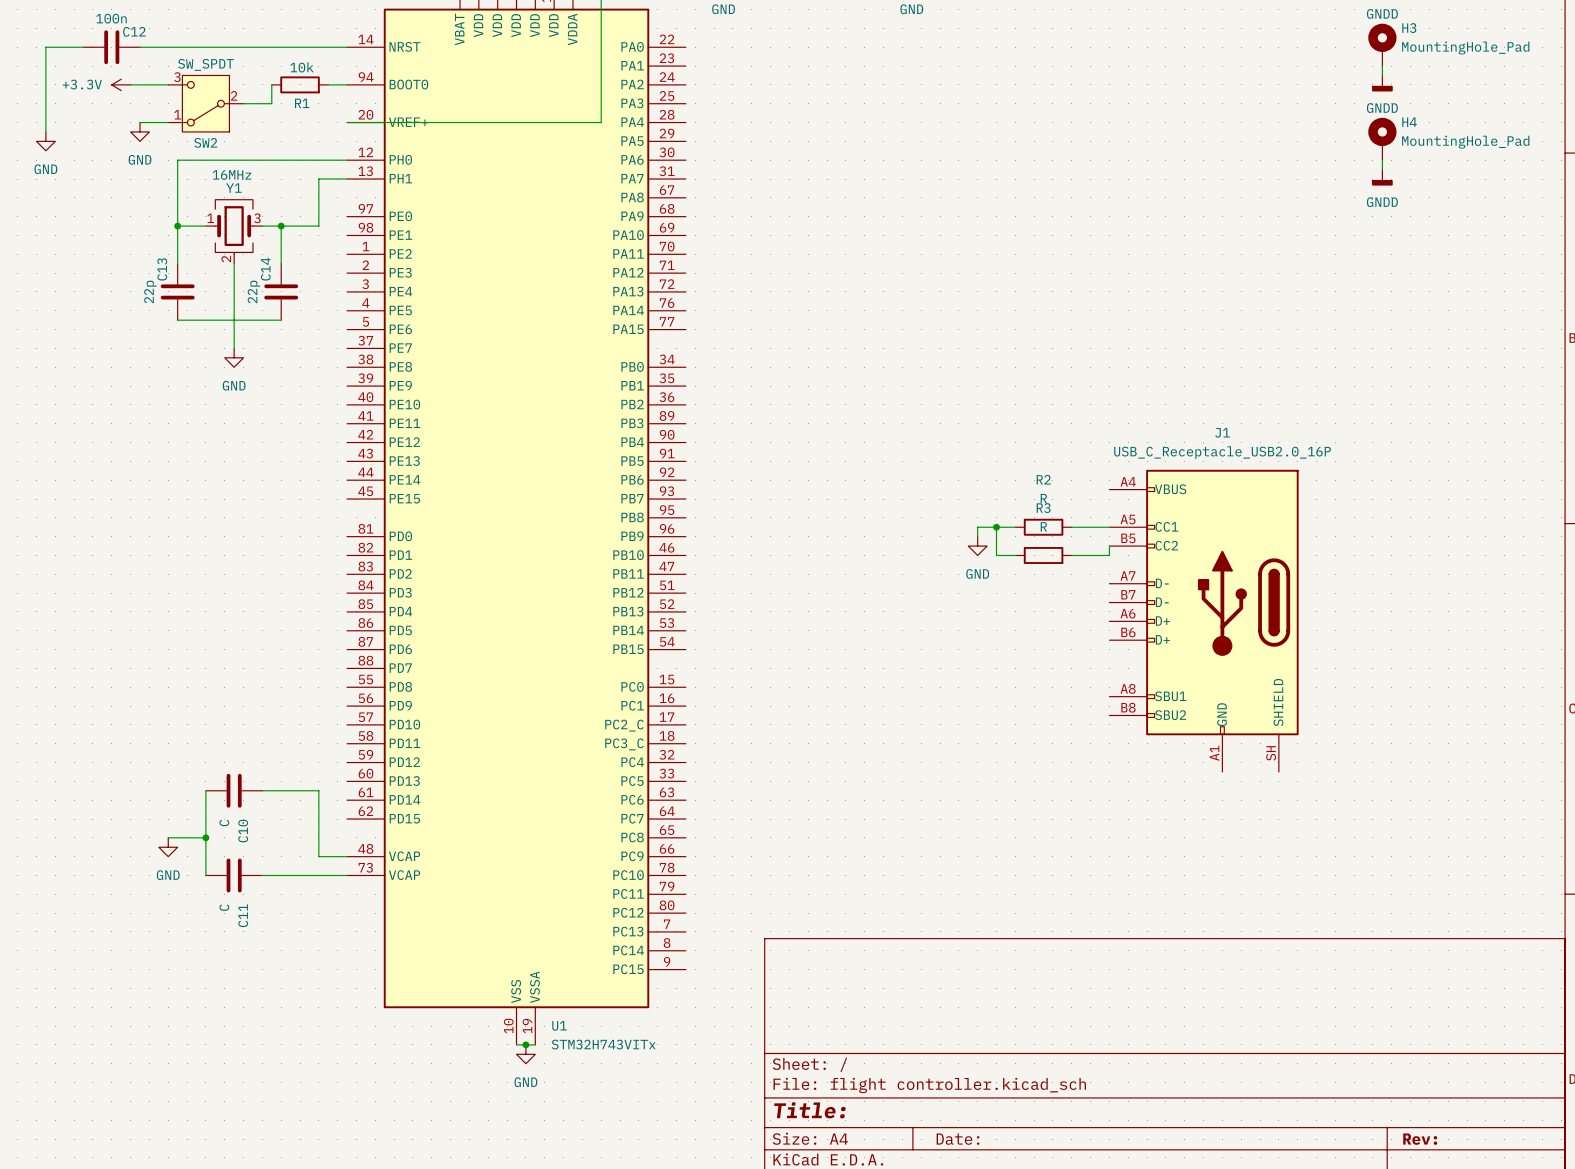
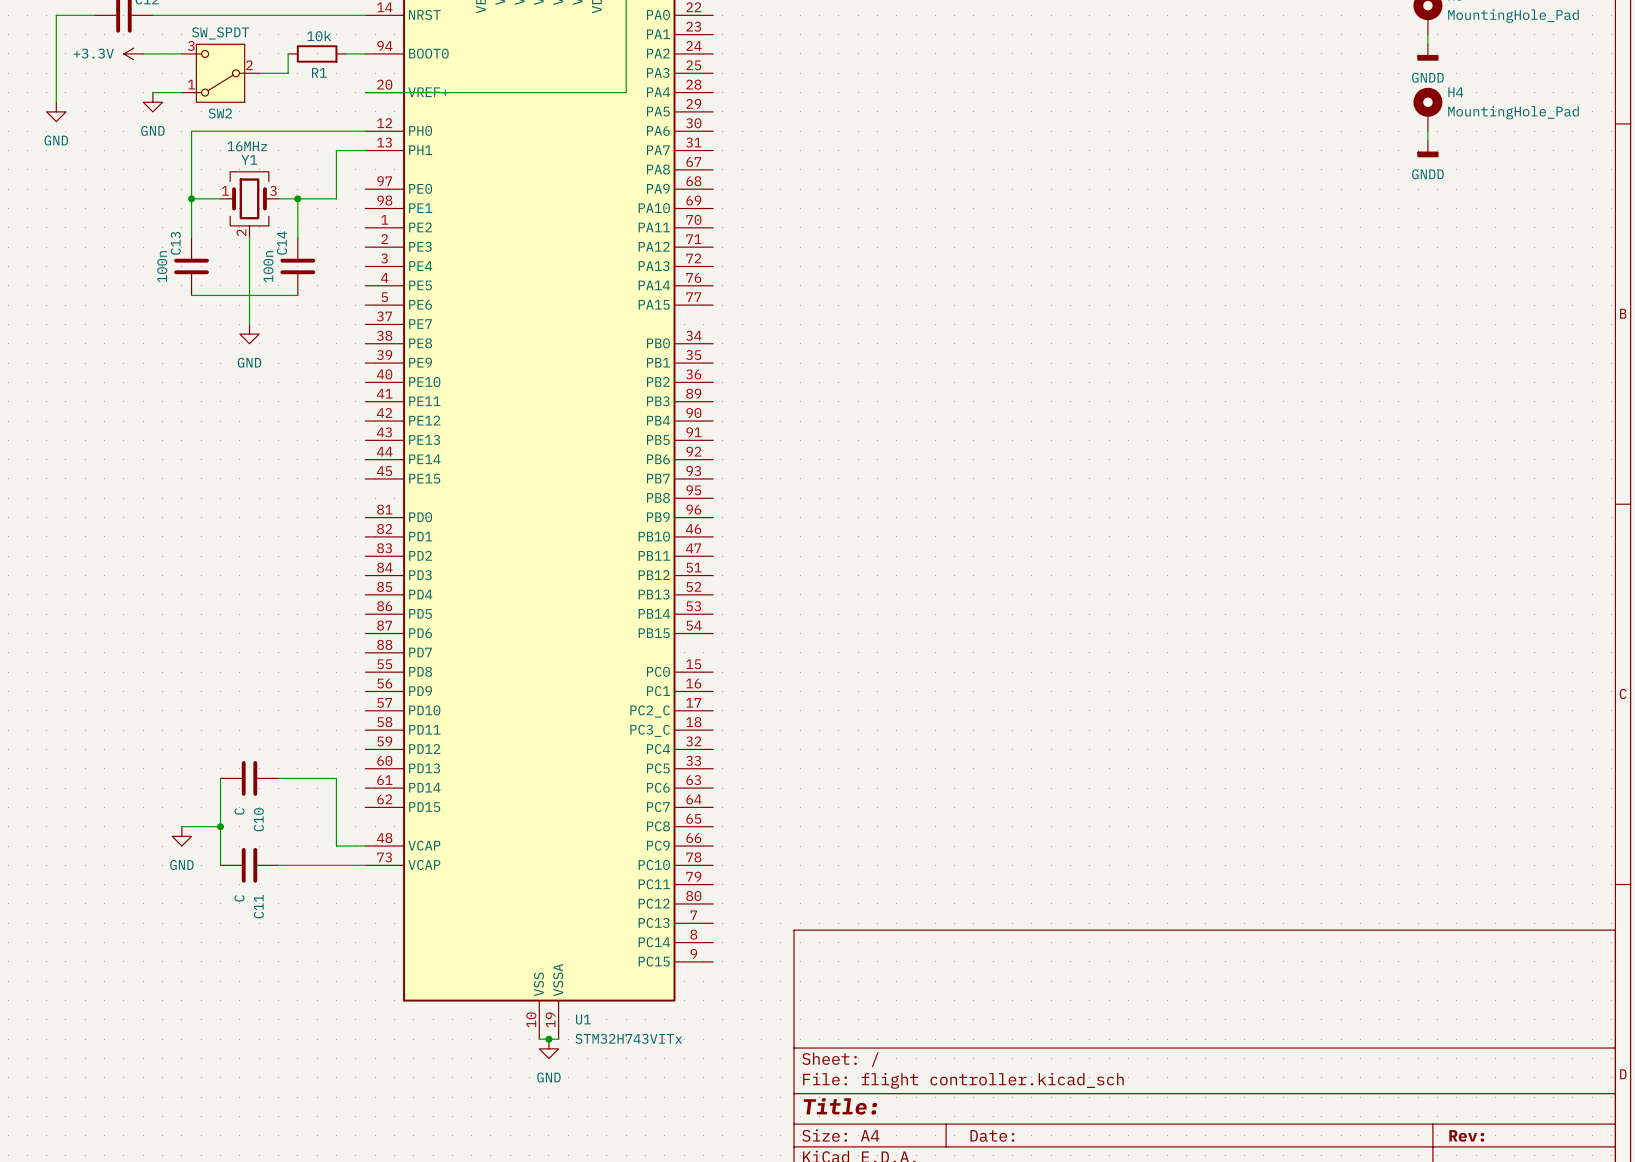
C13 value: 22p (150, 291) -> 100n (162, 266)
C14 value: 22p (253, 291) -> 100n (268, 266)
wire: (996, 527) (996, 555) (1015, 555) -> none
junction: (996, 527) -> none
wire: (1015, 527) (977, 527) (977, 536) -> none
R2: R (1043, 527) -> none
wire: (1071, 527) (1109, 527) -> none
power symbol: GND (977, 546) -> none
wire: (1109, 546) (1109, 555) (1071, 555) -> none
R3: R (1043, 555) -> none
J1: USB_C_Receptacle_USB2.0_16P (1204, 620) -> none

